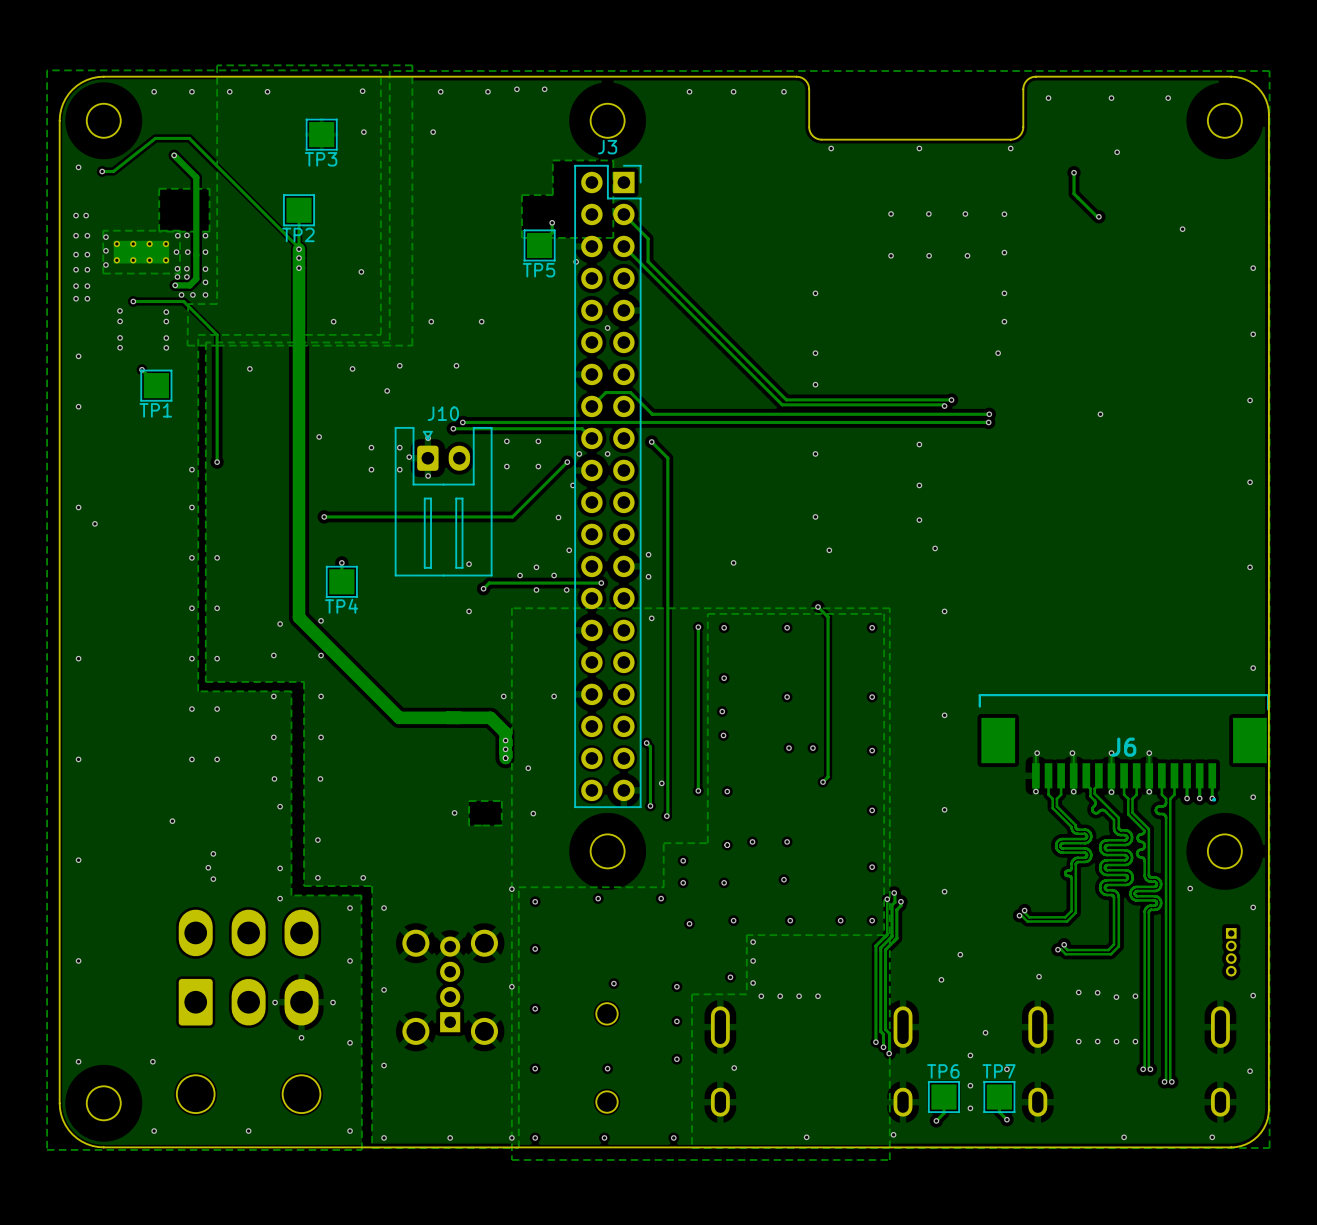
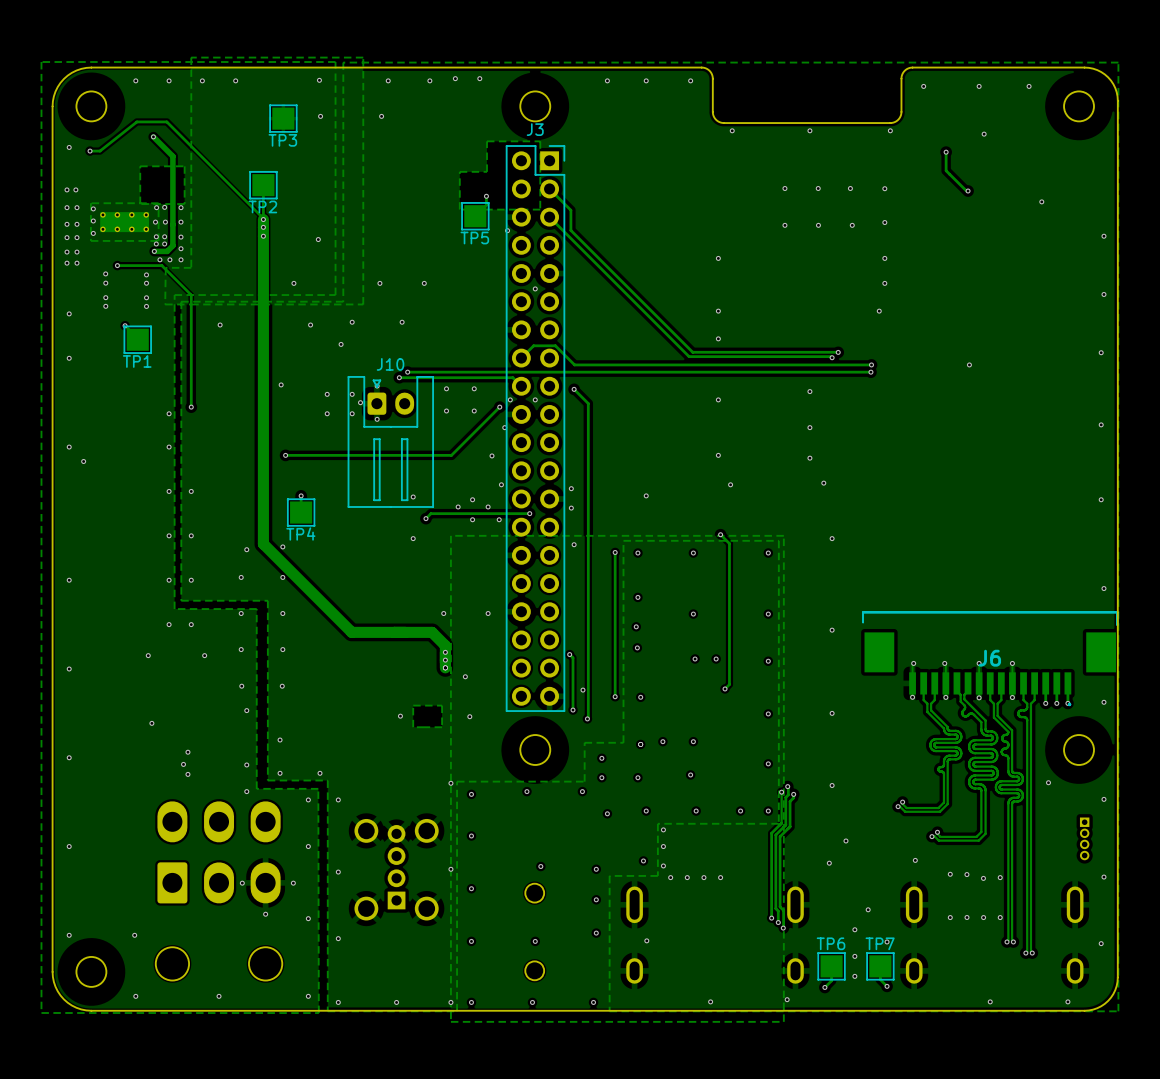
via: none -> (148, 655)
via: none -> (204, 655)
via: (191, 759) -> none
via: (217, 759) -> none

